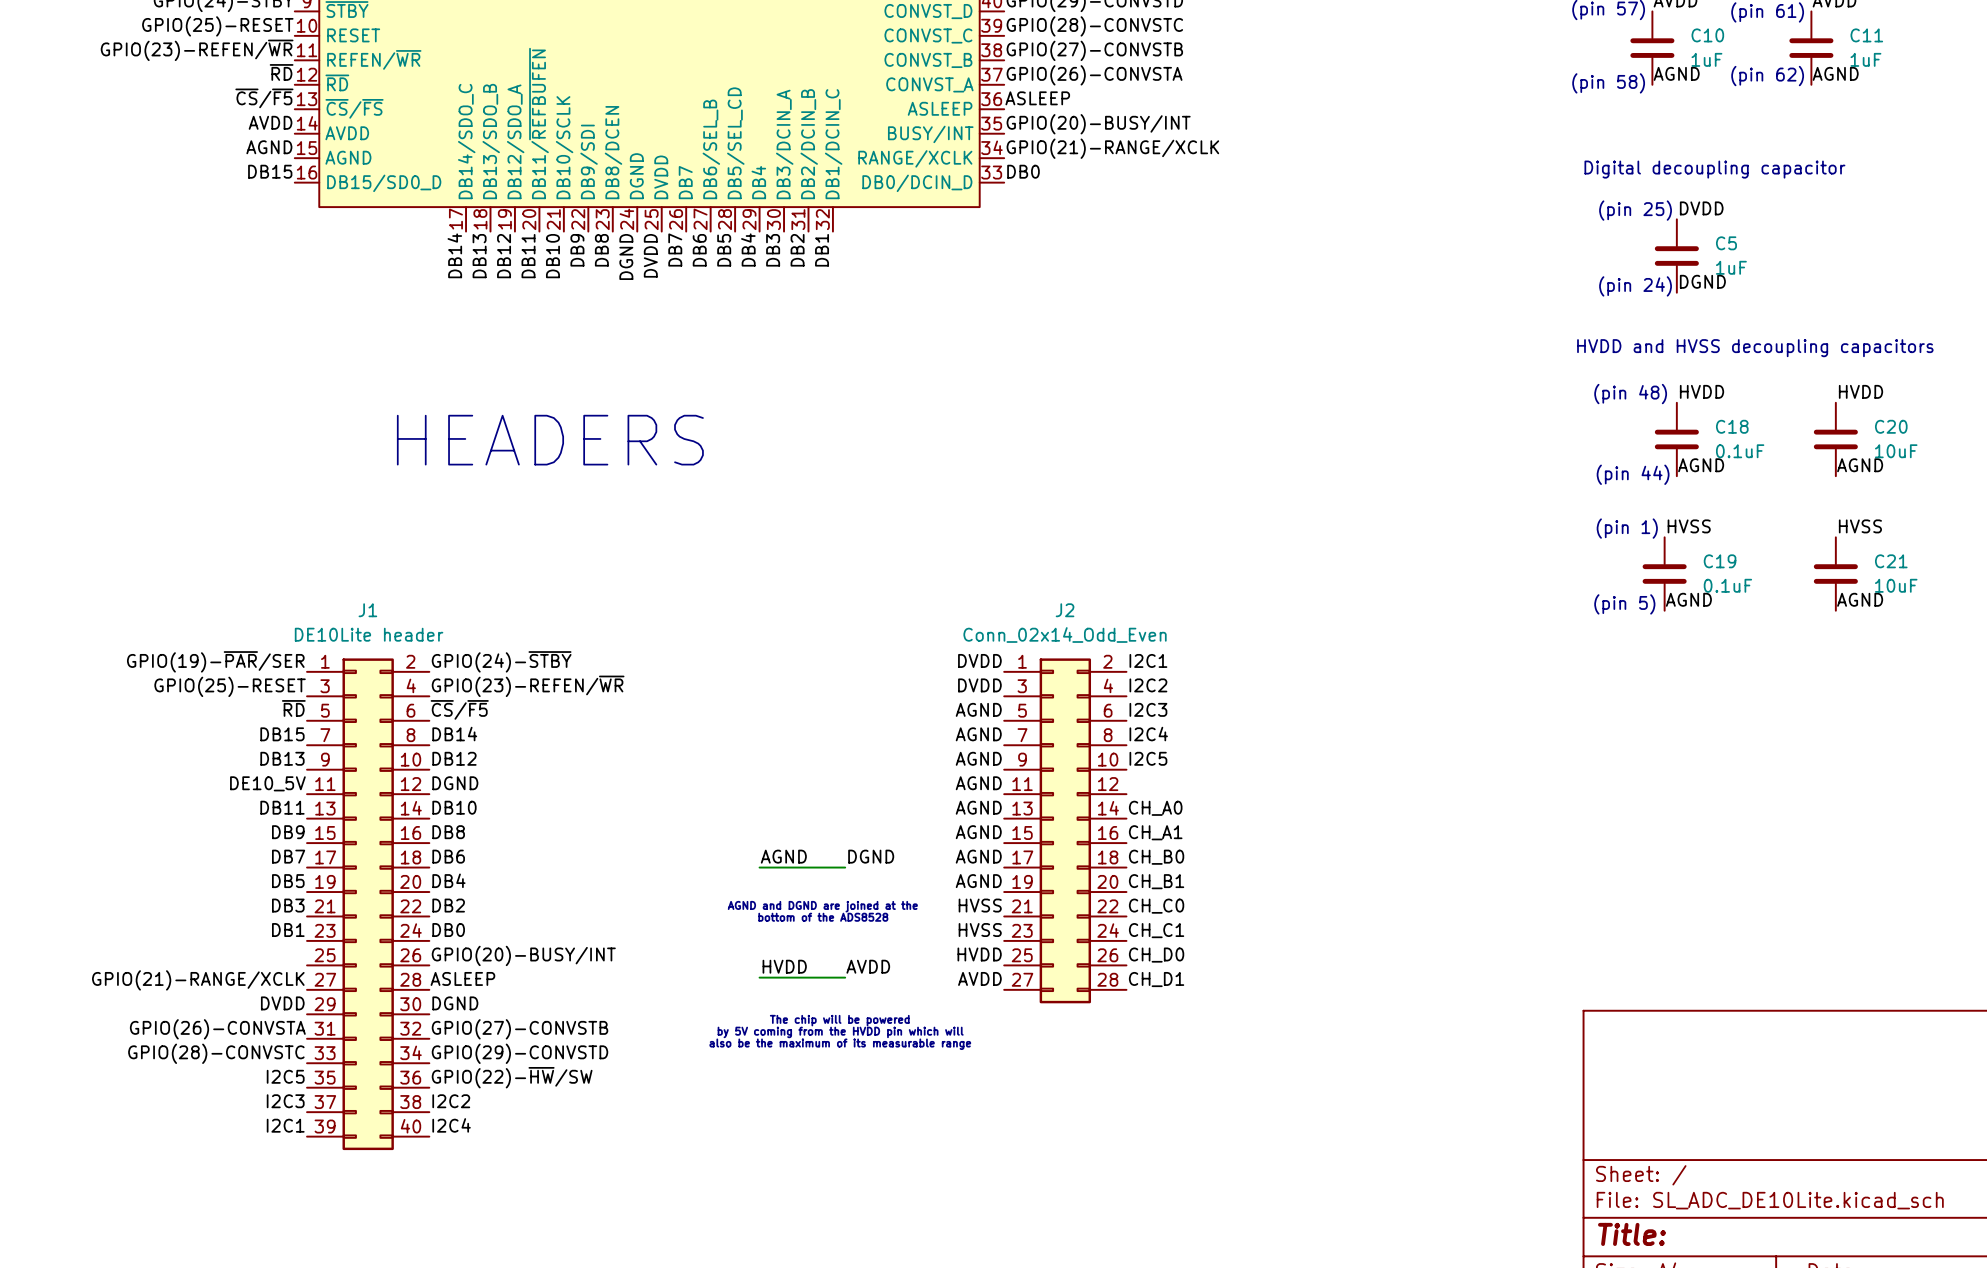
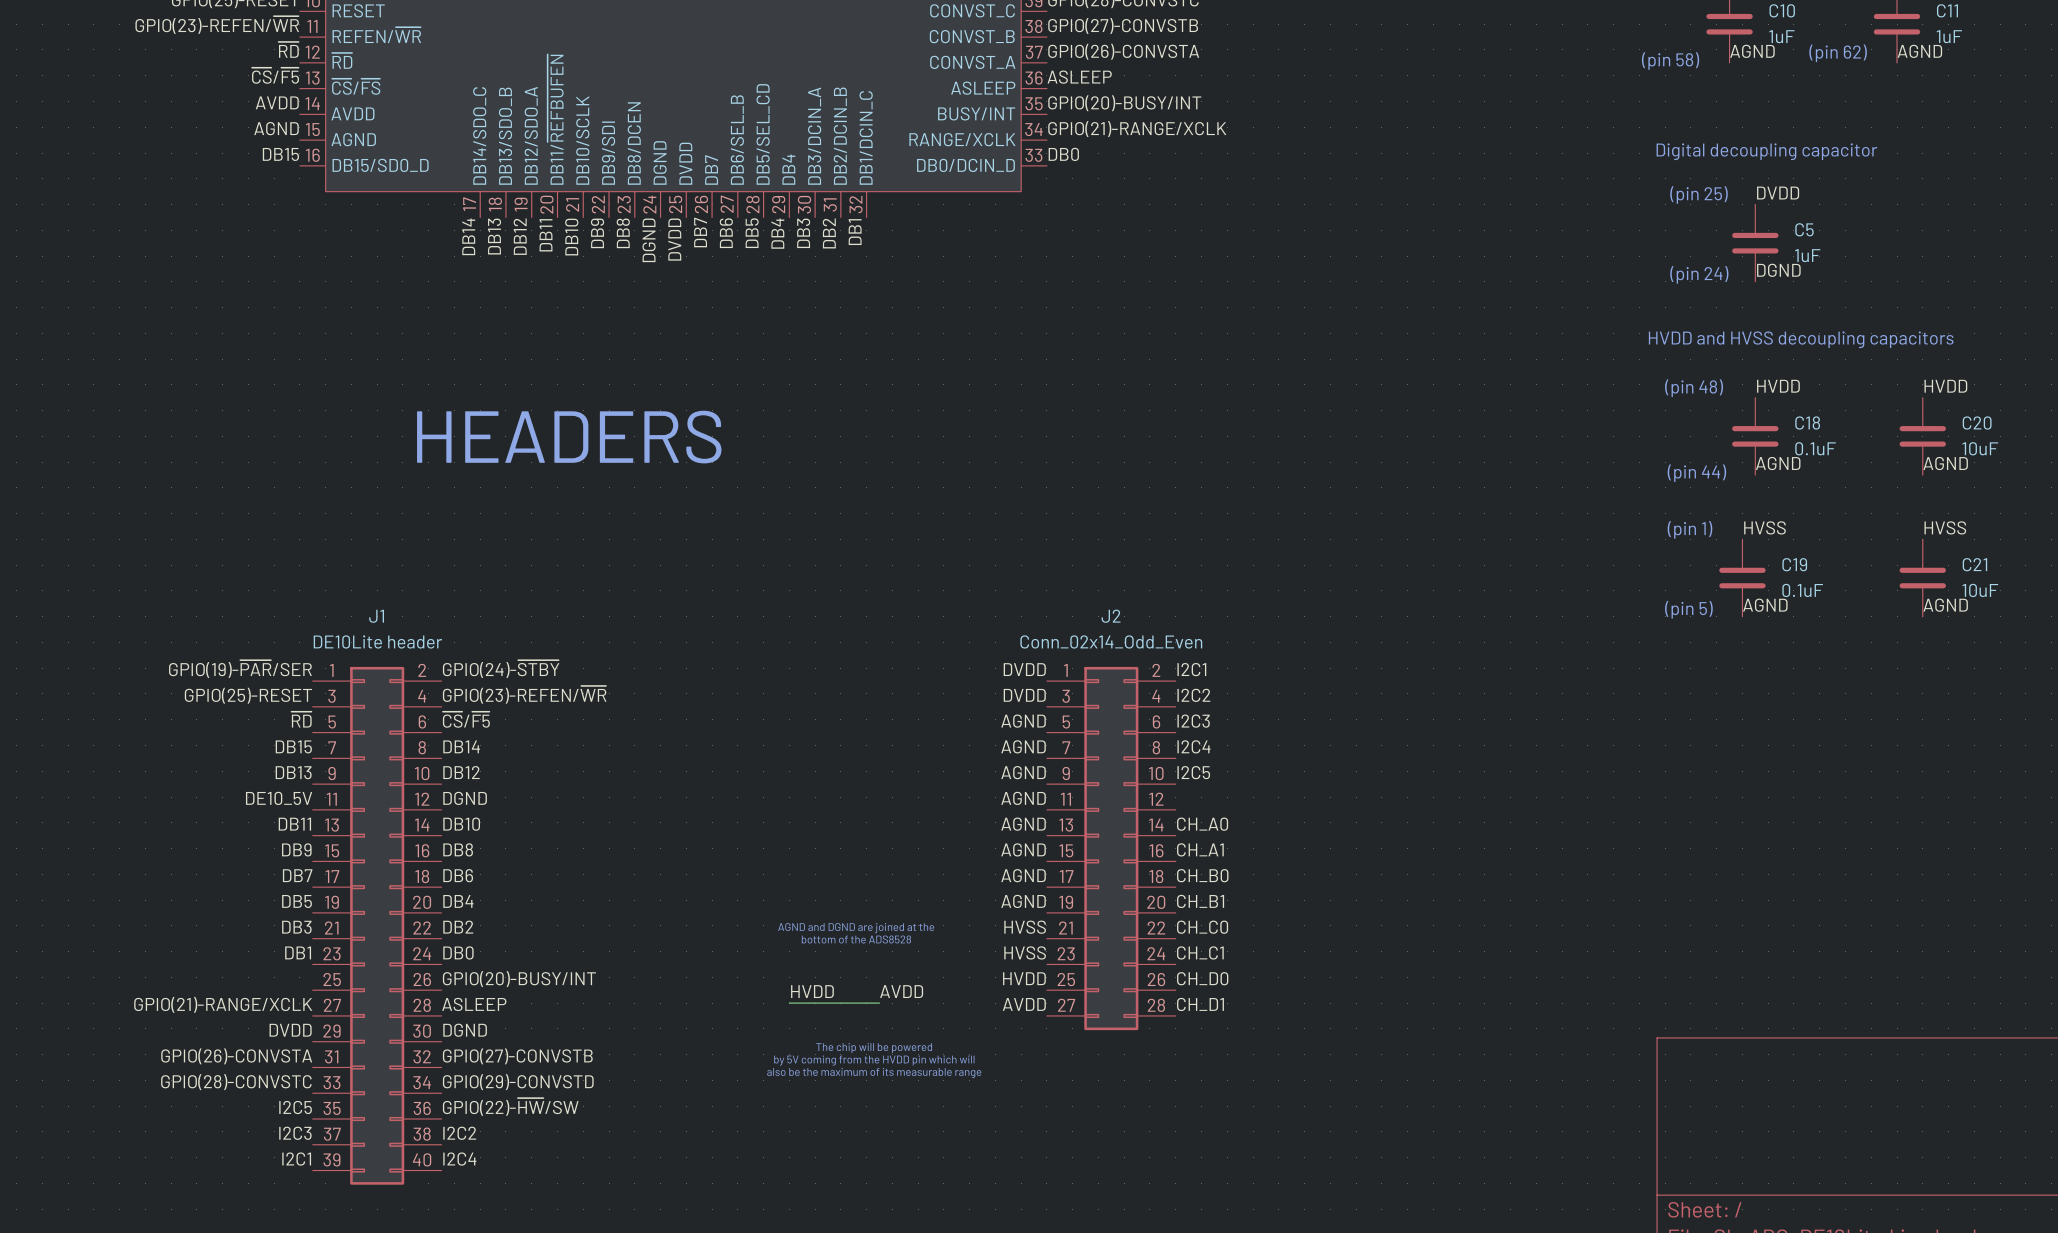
label: AGND (783, 856) -> none
label: DGND (871, 856) -> none
wire: (759, 867) (845, 867) -> none

